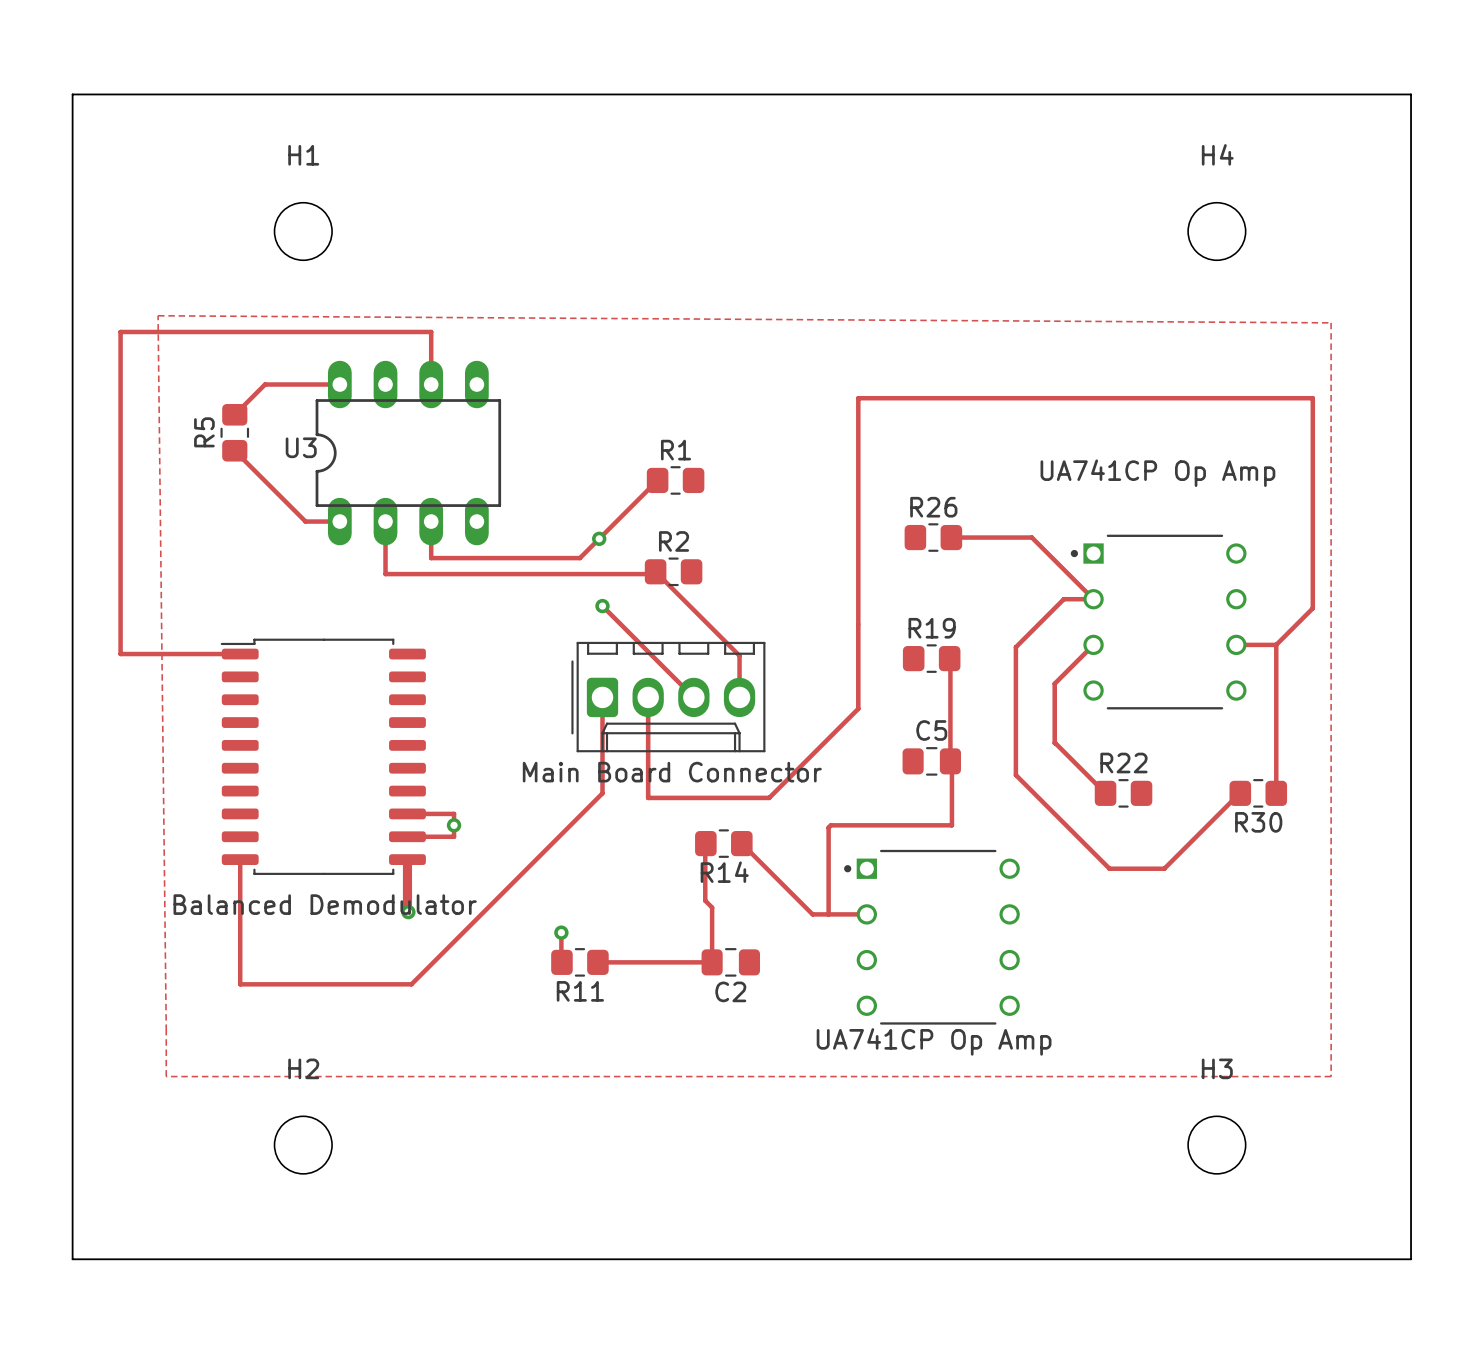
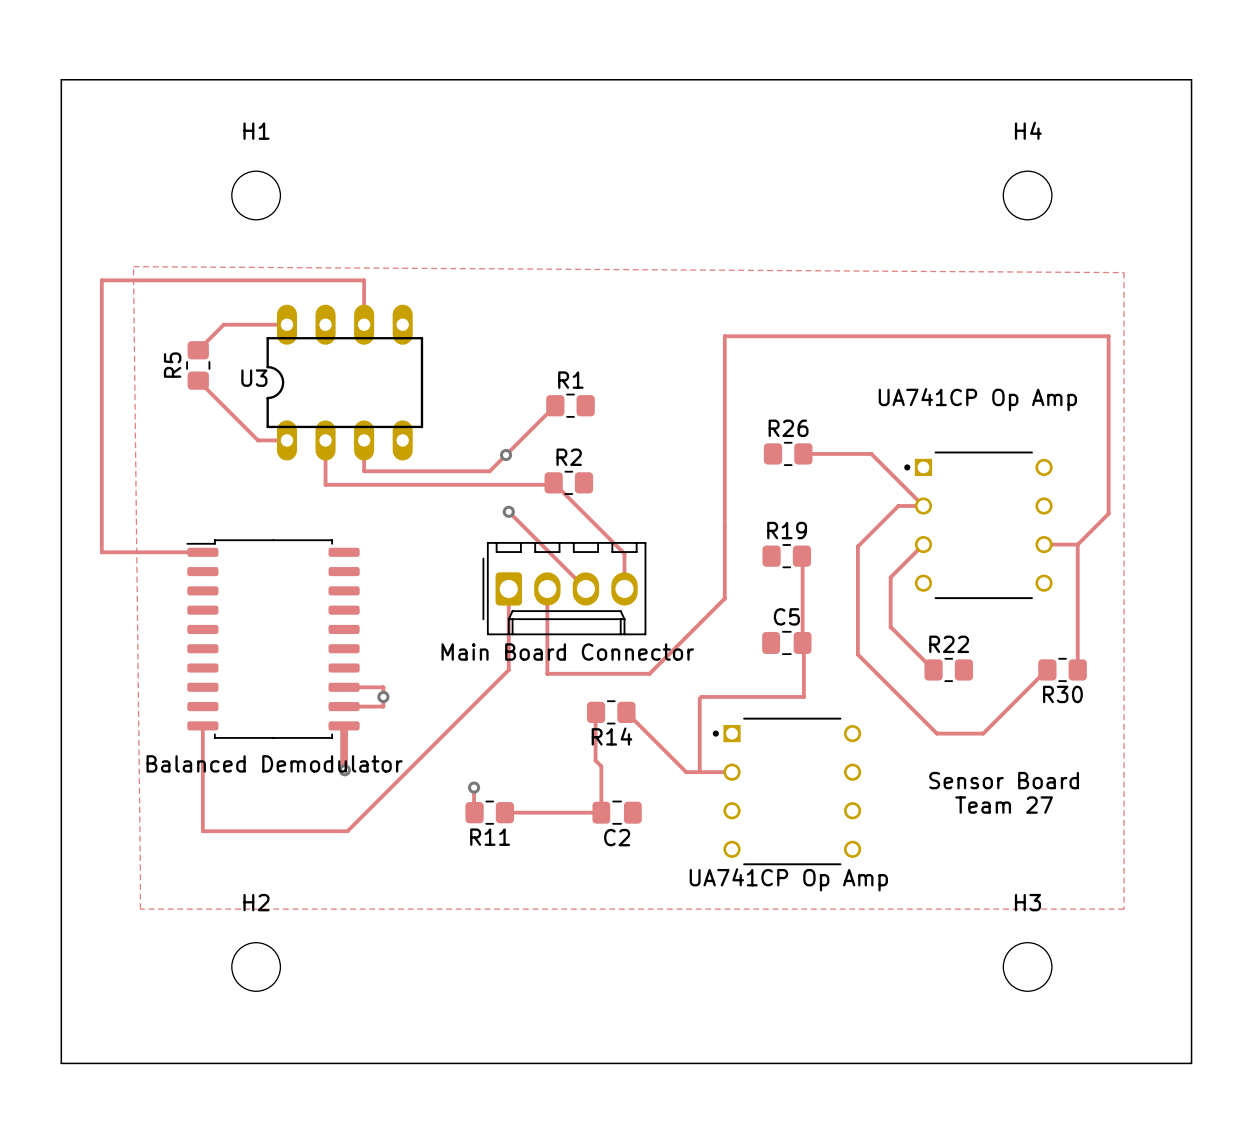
text: none -> Sensor Board (1004, 780)
text: none -> Team 27 (1004, 805)

